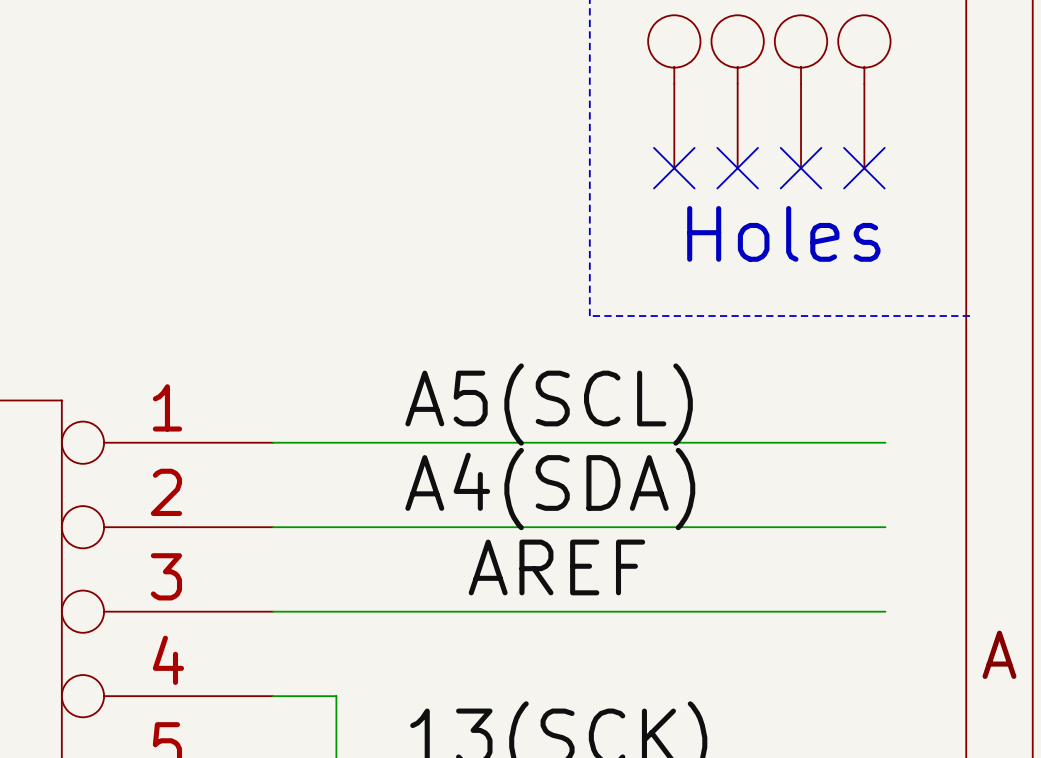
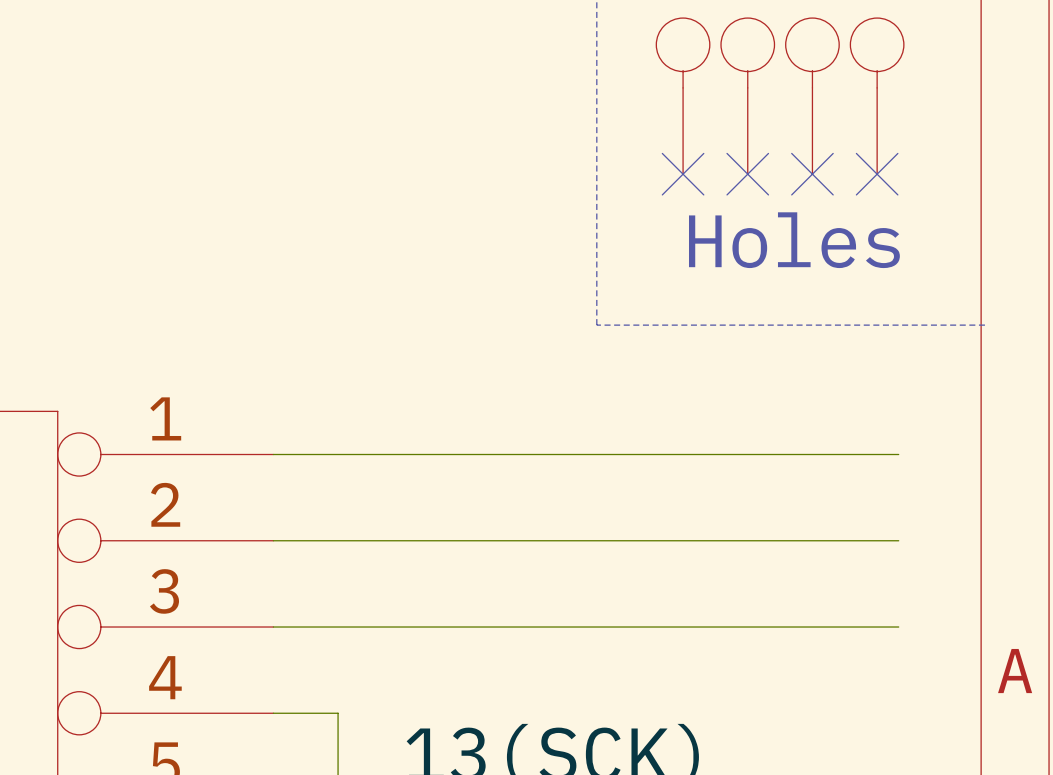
label: A5(SCL) (549, 404) -> none
label: A4(SDA) (550, 489) -> none
label: AREF (556, 567) -> none

